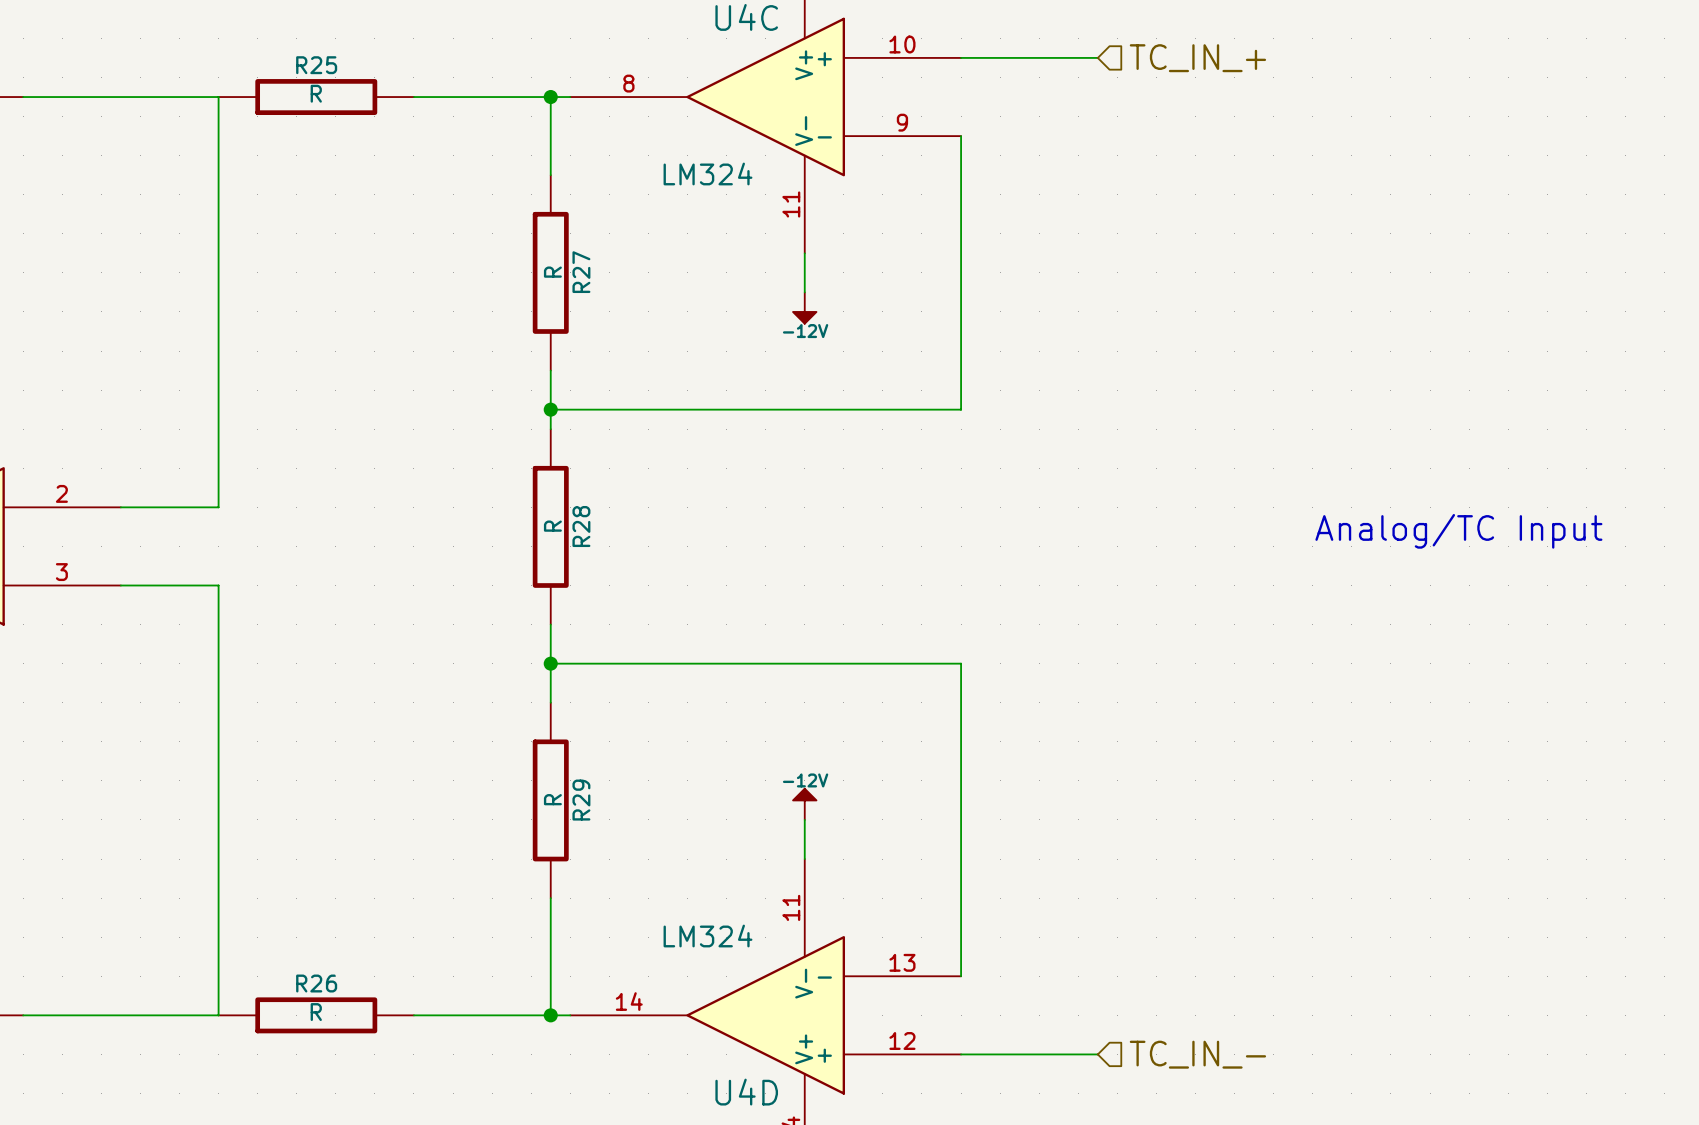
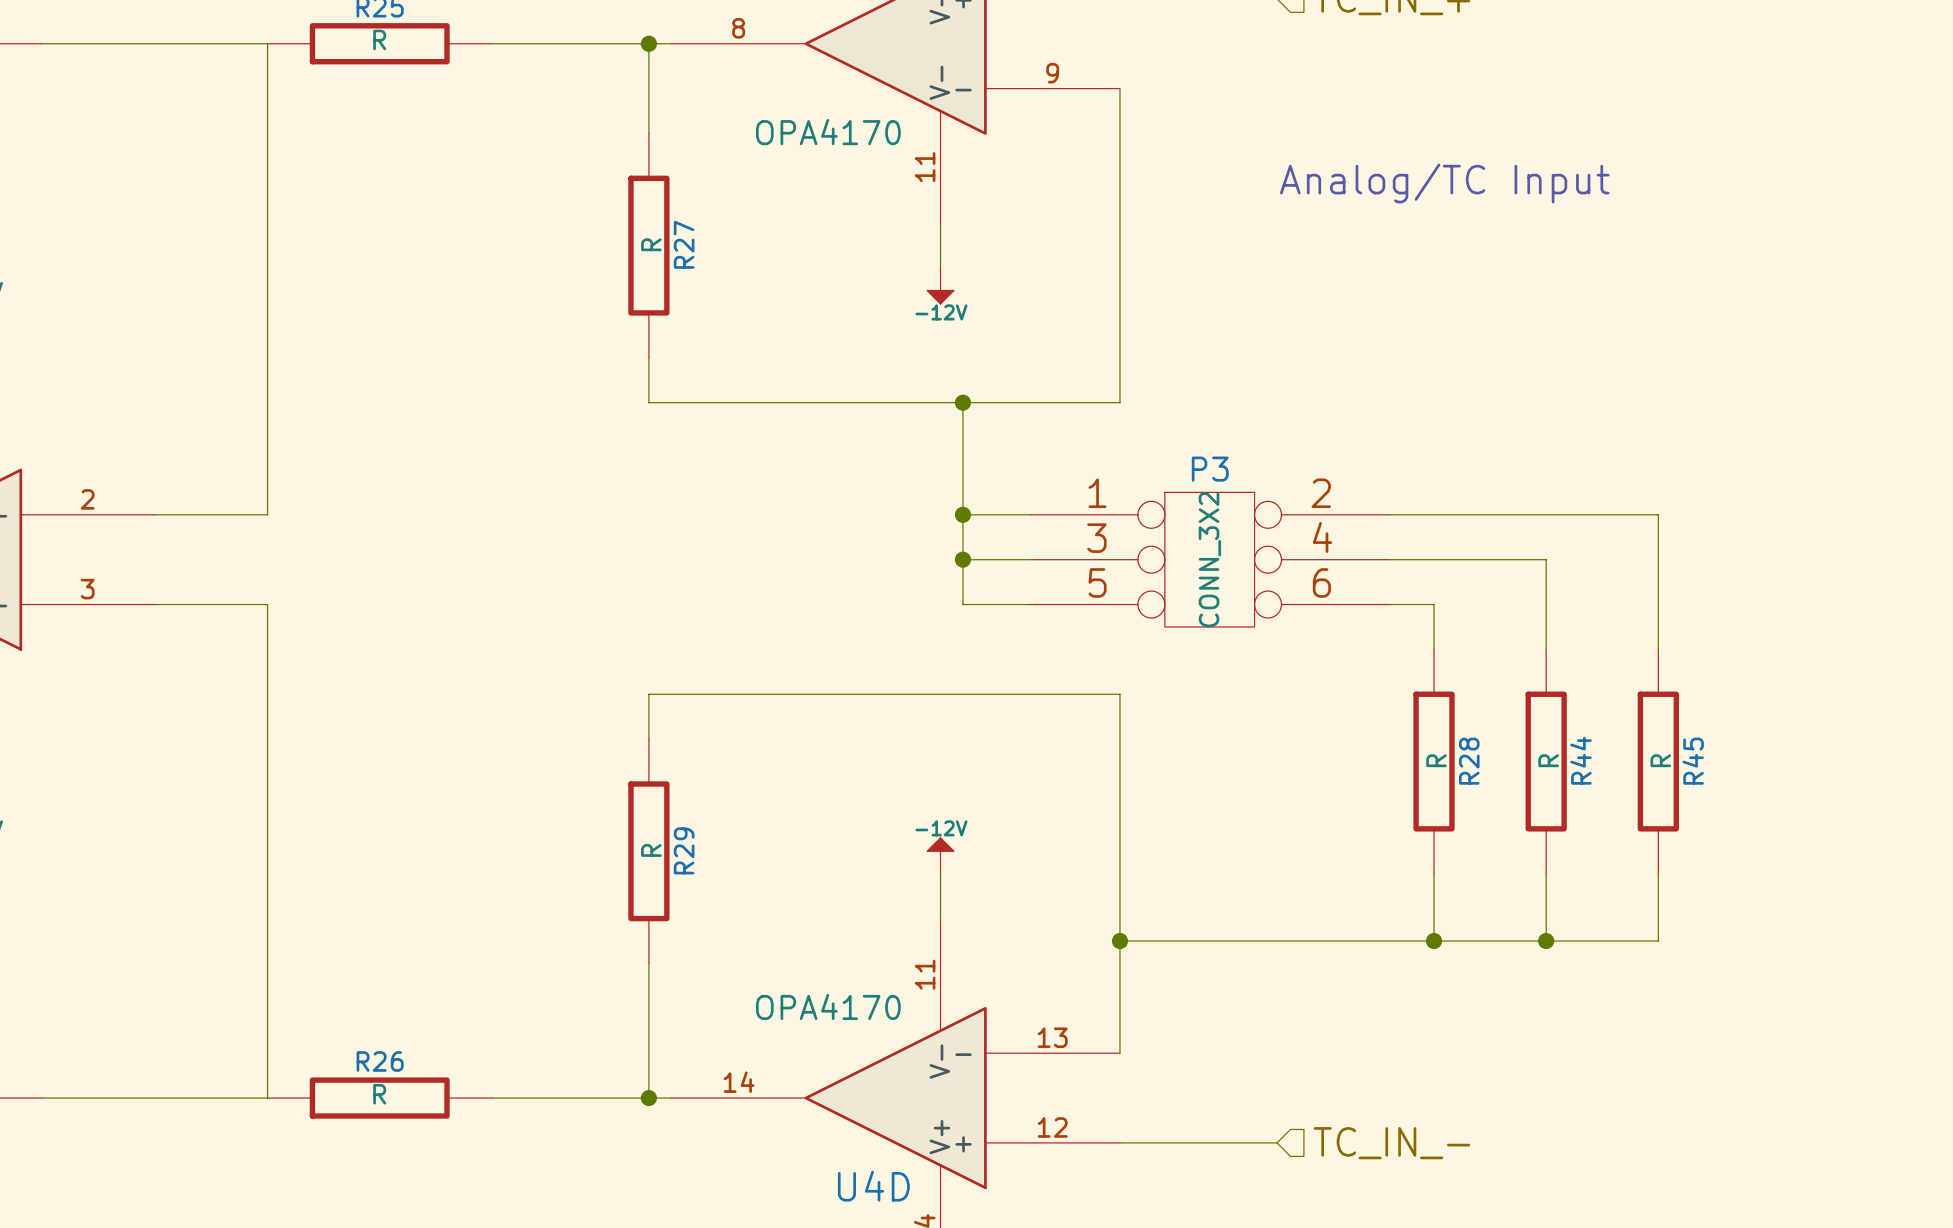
U4C value: LM324 (707, 173) -> OPA4170 (828, 132)
wire: (550, 409) (550, 429) -> none
junction: (550, 409) -> none
wire: none -> (962, 402) (962, 604) (1030, 604)
junction: none -> (962, 402)
wire: none -> (962, 514) (1030, 514)
junction: none -> (962, 514)
wire: none -> (1389, 514) (1658, 514) (1658, 649)
R28 position: (550, 526) -> (1434, 761)
text position: Analog/TC Input (1458, 531) -> Analog/TC Input (1444, 183)
wire: none -> (962, 559) (1030, 559)
junction: none -> (962, 559)
P3: none -> CONN_3X2 (1209, 559)
wire: none -> (1389, 559) (1546, 559) (1546, 649)
wire: none -> (1389, 604) (1434, 604) (1434, 649)
wire: (550, 624) (550, 663) -> none
junction: (550, 663) -> none
R44: none -> R (1546, 761)
R45: none -> R (1658, 761)
wire: none -> (1434, 873) (1434, 941)
wire: none -> (1546, 873) (1546, 941)
wire: none -> (1658, 873) (1658, 941) (1119, 941)
junction: none -> (1119, 941)
junction: none -> (1434, 941)
junction: none -> (1546, 941)
U4D value: LM324 (707, 936) -> OPA4170 (828, 1006)

